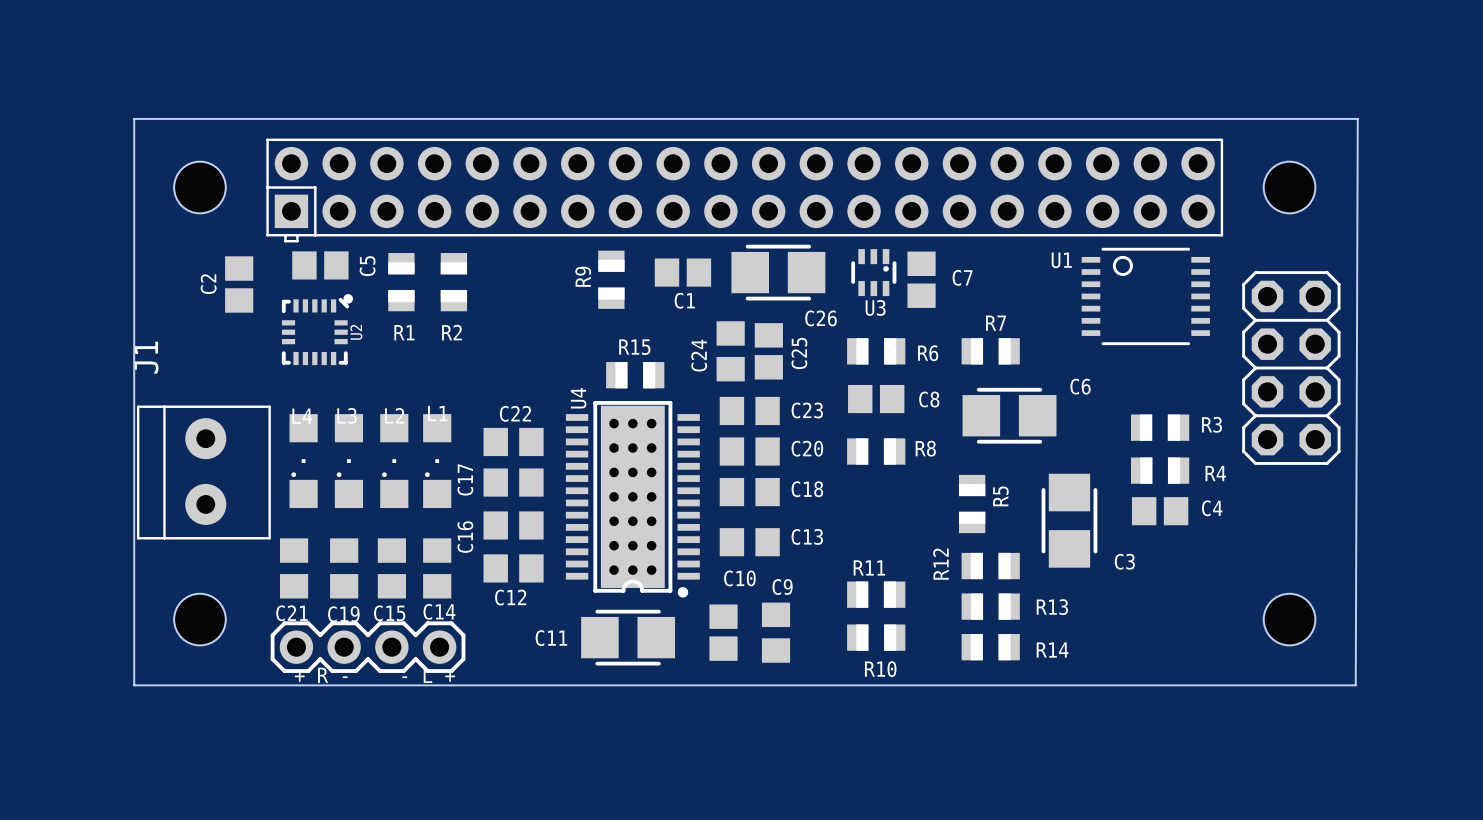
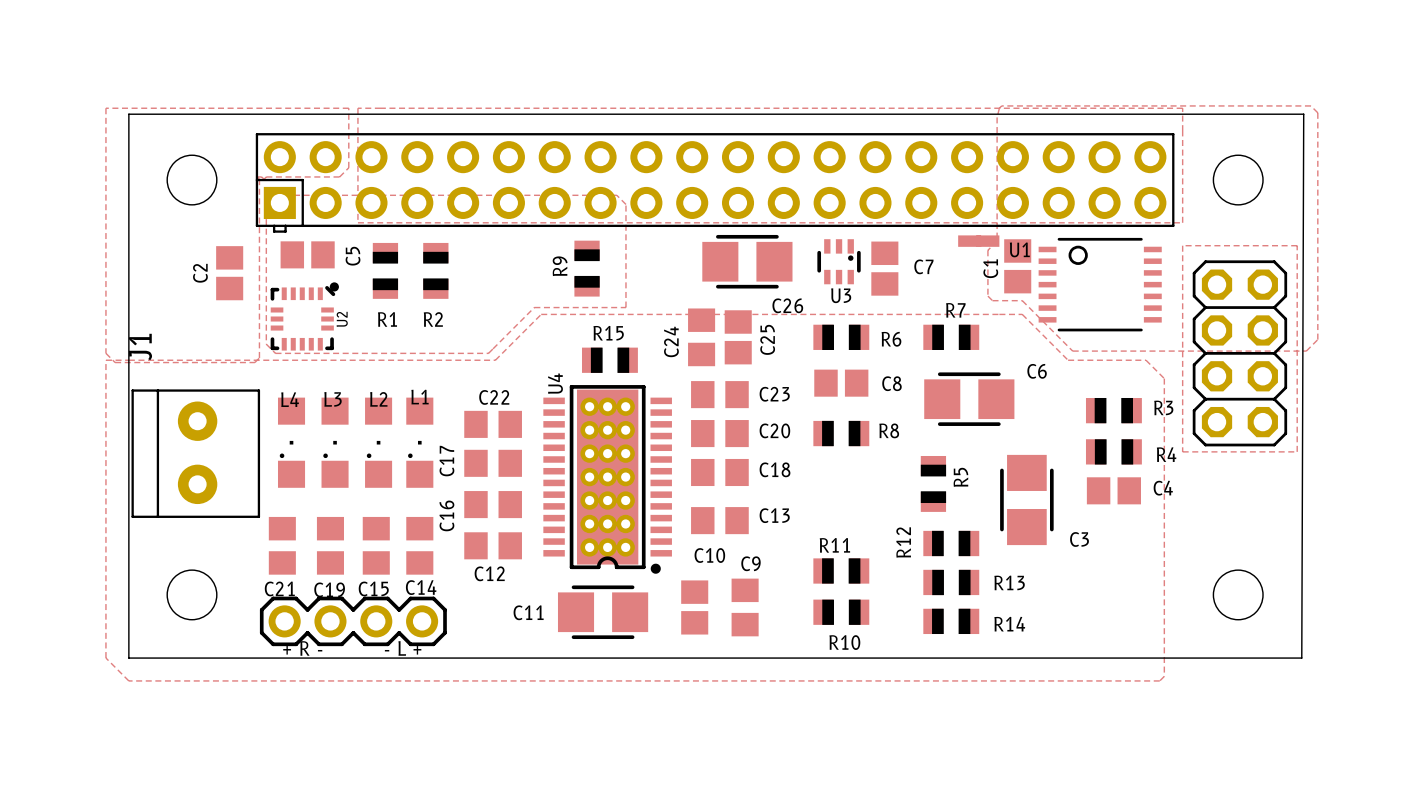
zone outline: none -> (1001, 105) (1310, 105) (1317, 112) (1317, 339) (1306, 351) (1072, 351) (1022, 300) (992, 300) (987, 296) (987, 250) (997, 241) (997, 117) (1001, 105)
zone outline: none -> (105, 108) (105, 353) (115, 362) (254, 362) (259, 357) (259, 179) (257, 176) (264, 179) (266, 176) (339, 176) (348, 167) (348, 108) (105, 108)
zone outline: none -> (357, 108) (1182, 108) (1182, 222) (357, 222) (357, 108)
zone outline: none -> (270, 195) (616, 195) (625, 204) (625, 307) (534, 307) (488, 353) (275, 353) (266, 344) (266, 199) (270, 195)
part: none -> (978, 241)
zone outline: none -> (1182, 245) (1182, 451) (1297, 451) (1297, 245) (1182, 245)
C1 rotation: 0° (682, 272) -> 90° clockwise (1017, 266)
C1 position: (682, 272) -> (1017, 266)
zone outline: none -> (541, 314) (495, 360) (105, 360) (105, 658) (128, 680) (1159, 680) (1164, 676) (1164, 378) (1146, 360) (1068, 360) (1022, 314) (541, 314)

